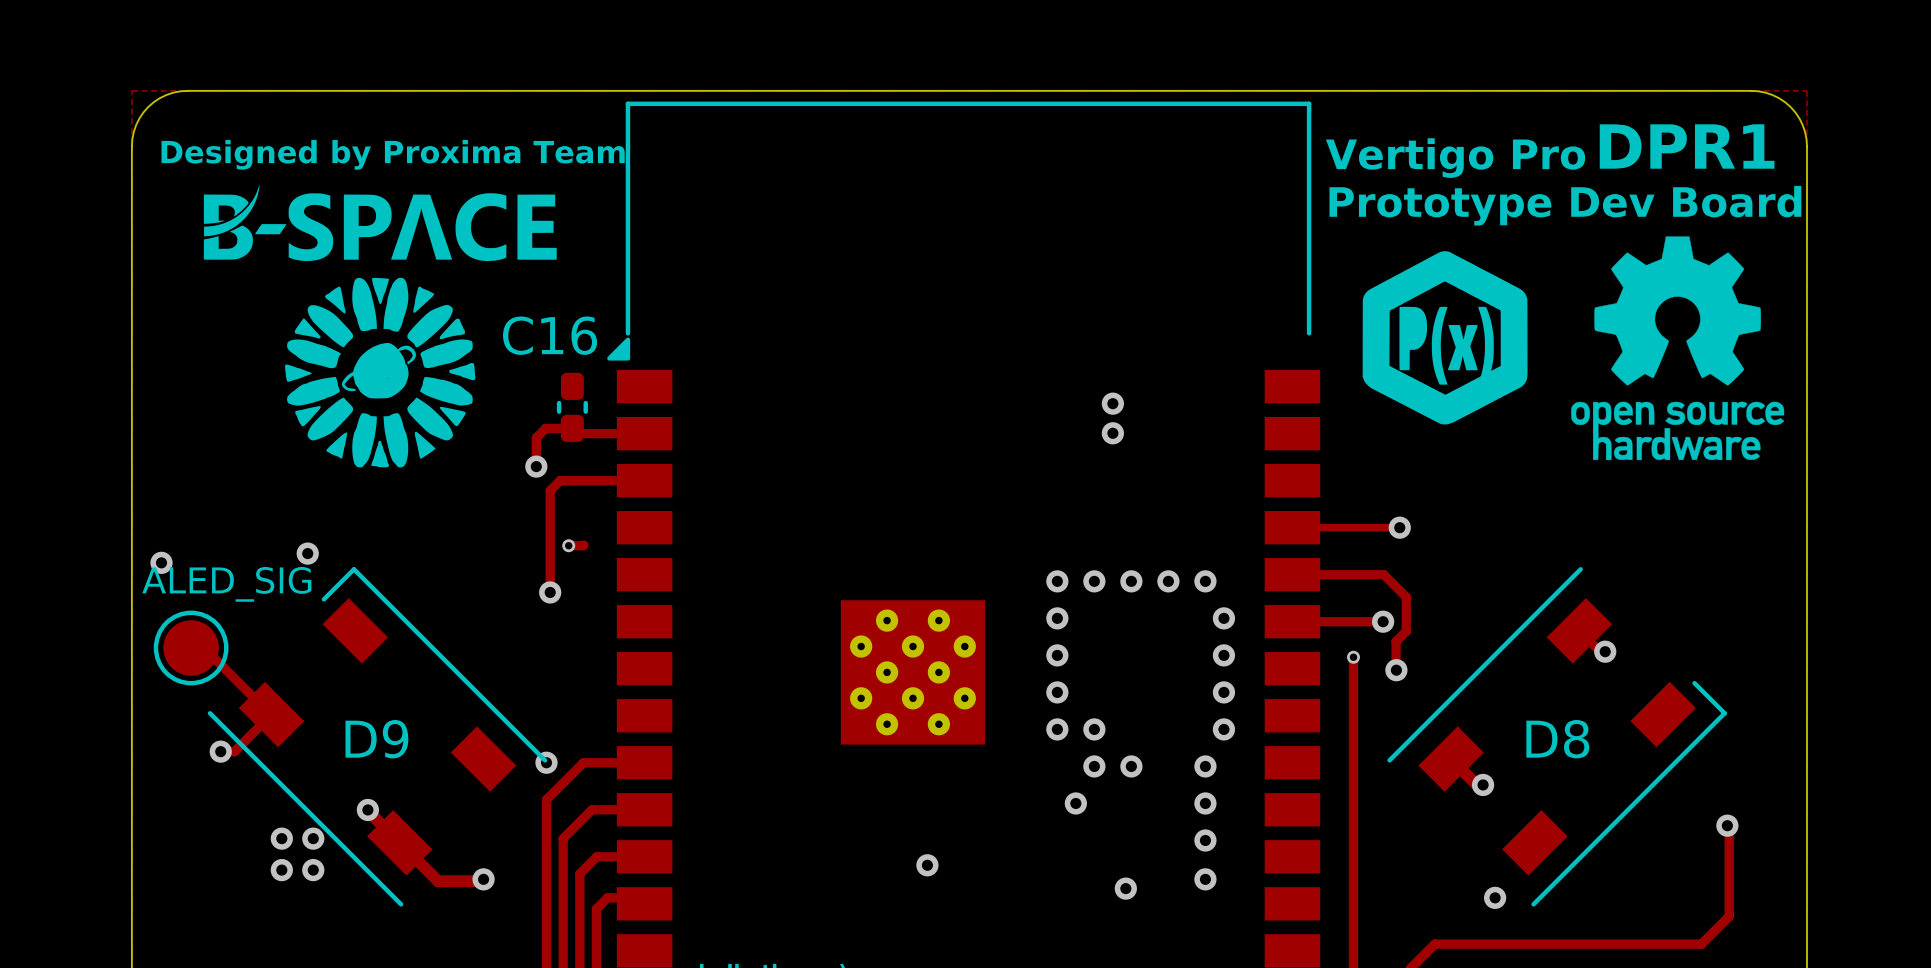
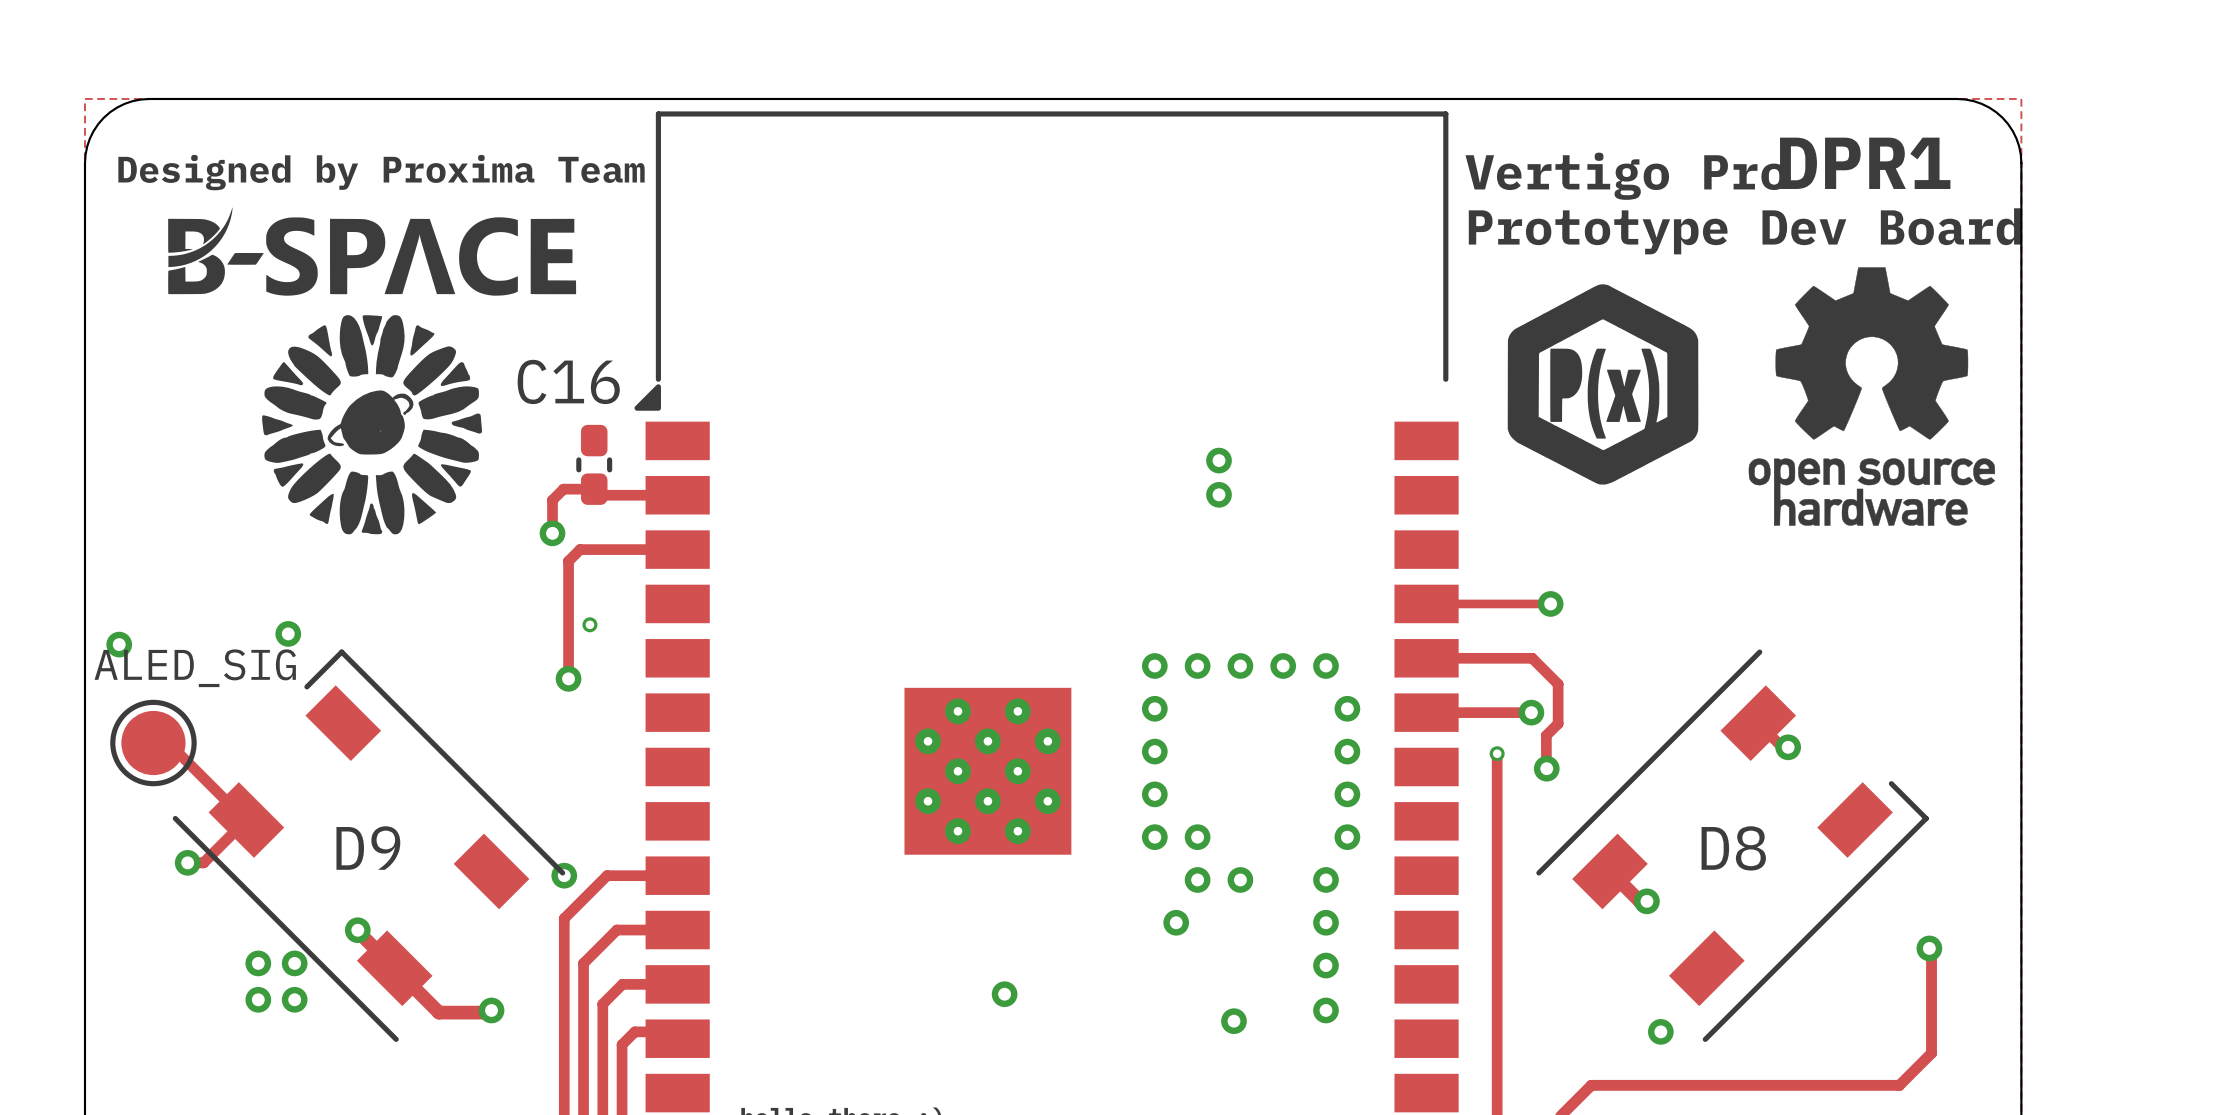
track: (583, 545) (568, 545) -> none

